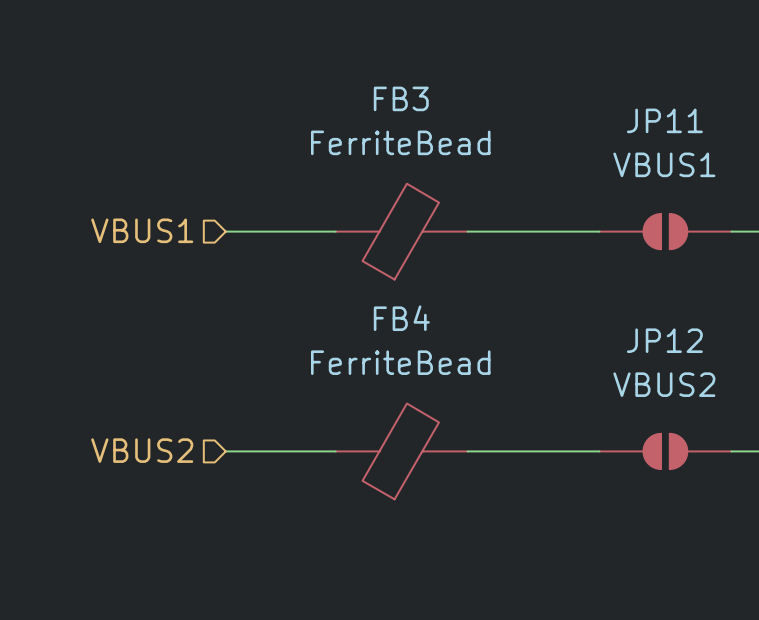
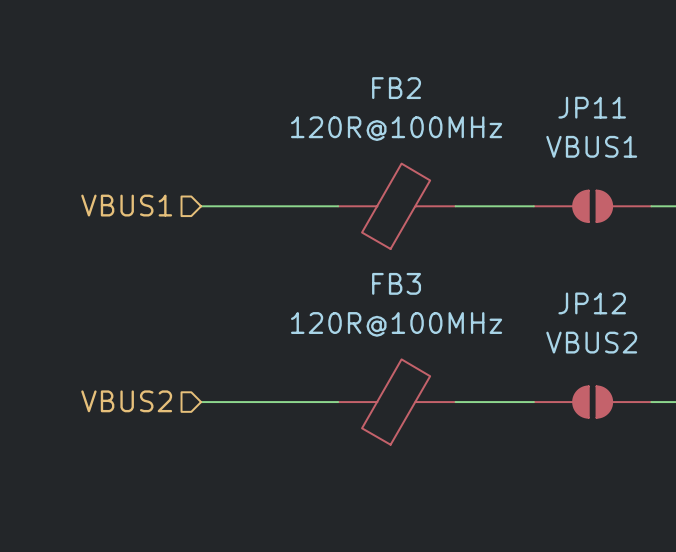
FB3 value: FerriteBead (400, 142) -> 120R@100MHz (396, 324)
FB3 position: (401, 231) -> (396, 402)
FB2: none -> 120R@100MHz (396, 206)
FB4: FerriteBead (401, 451) -> none

